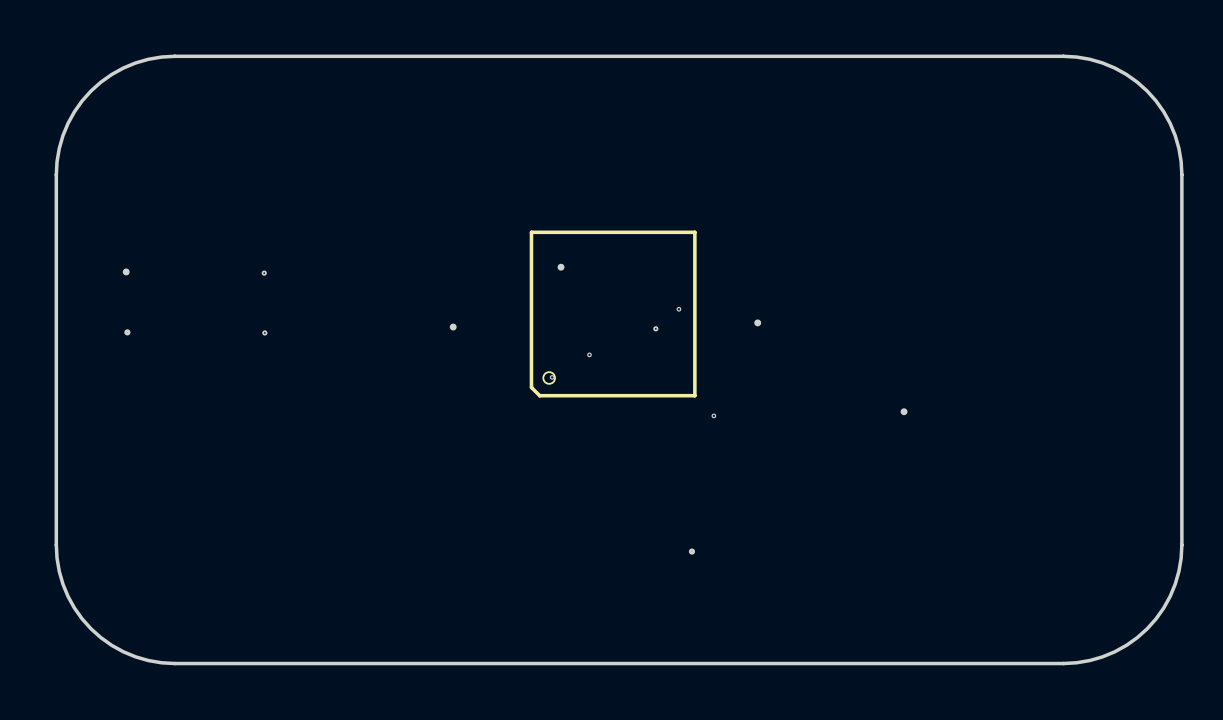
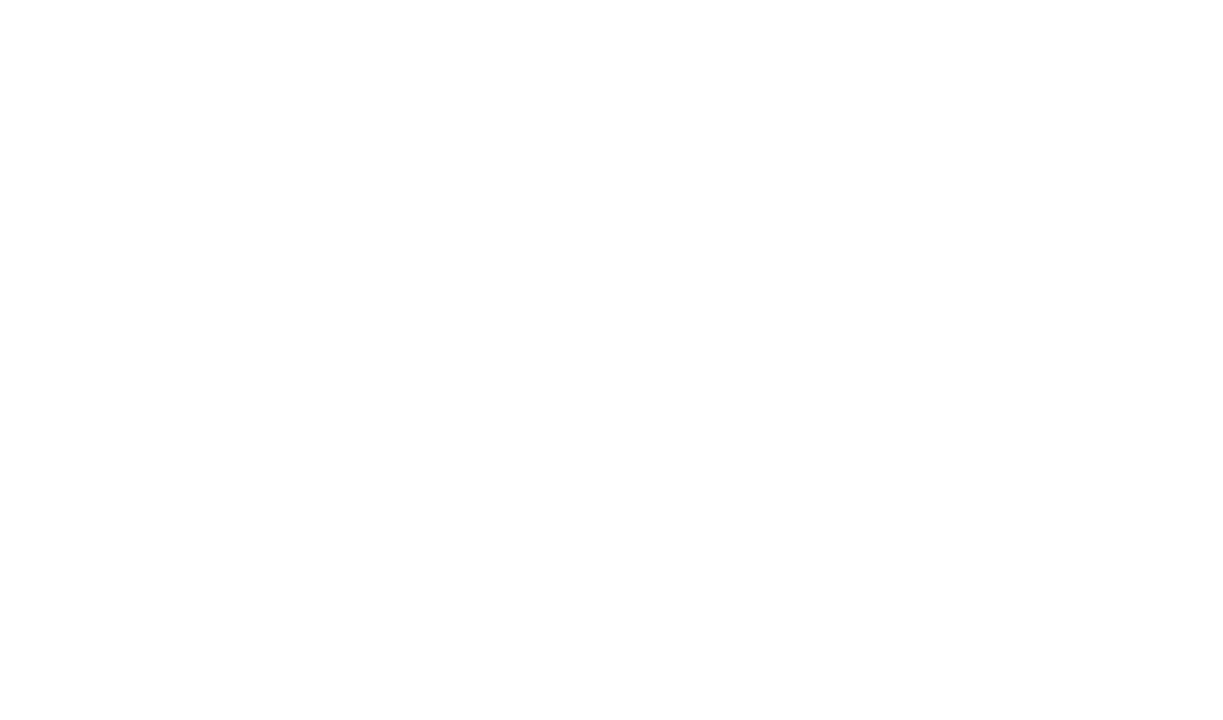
board edge: (1063, 56) (174, 56) (148, 59) (123, 68) (100, 82) (74, 111) (62, 135) (57, 161) (56, 545) (59, 571) (68, 596) (82, 618) (111, 645) (135, 656) (174, 663) (1063, 663) (1089, 660) (1114, 651) (1137, 637) (1156, 618) (1175, 584) (1181, 558) (1181, 161) (1170, 123) (1147, 91) (1114, 68) (1089, 59) (1063, 56) -> none
round board edge: [557, 263, 565, 271] -> none
round board edge: [122, 268, 130, 276] -> none
round board edge: [261, 270, 267, 276] -> none
round board edge: [676, 306, 682, 312] -> none
part: (613, 314) -> none
round board edge: [754, 319, 762, 327] -> none
round board edge: [449, 323, 457, 331] -> none
round board edge: [653, 326, 659, 332] -> none
round board edge: [124, 329, 131, 336] -> none
round board edge: [262, 330, 268, 336] -> none
round board edge: [587, 352, 592, 358] -> none
round board edge: [549, 375, 555, 380] -> none
round board edge: [900, 408, 908, 416] -> none
round board edge: [711, 413, 717, 419] -> none
round board edge: [688, 548, 696, 555] -> none

